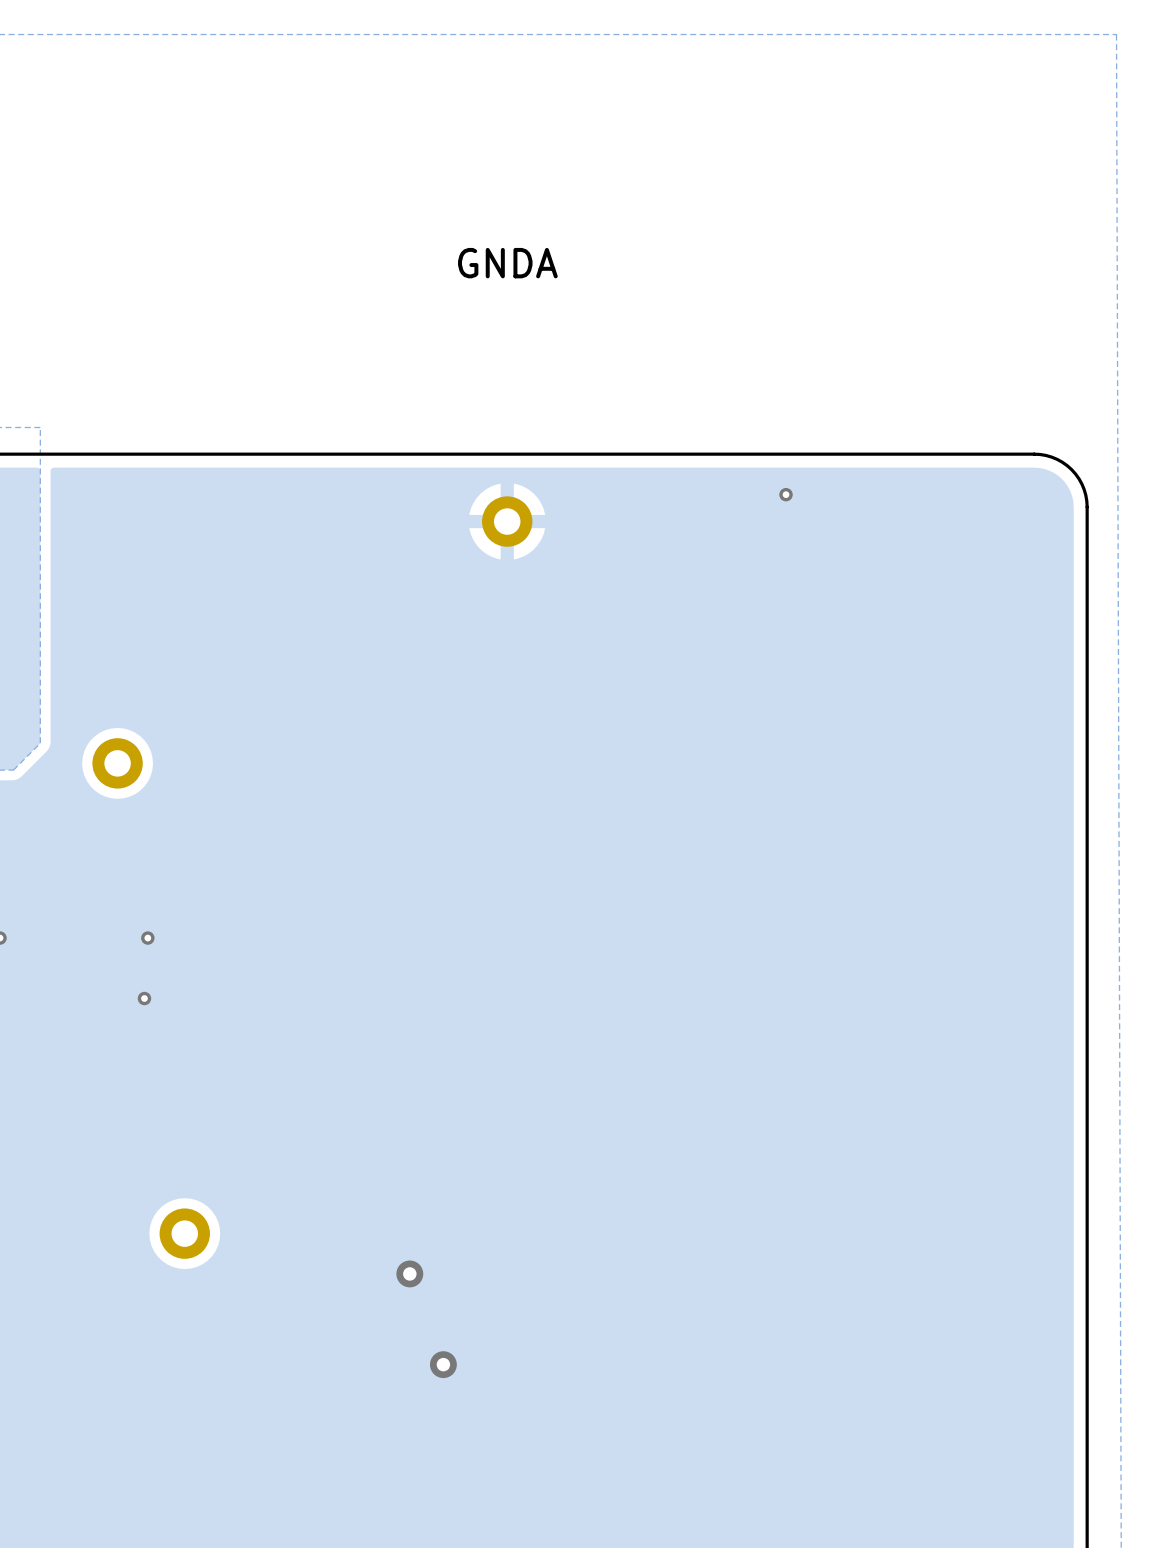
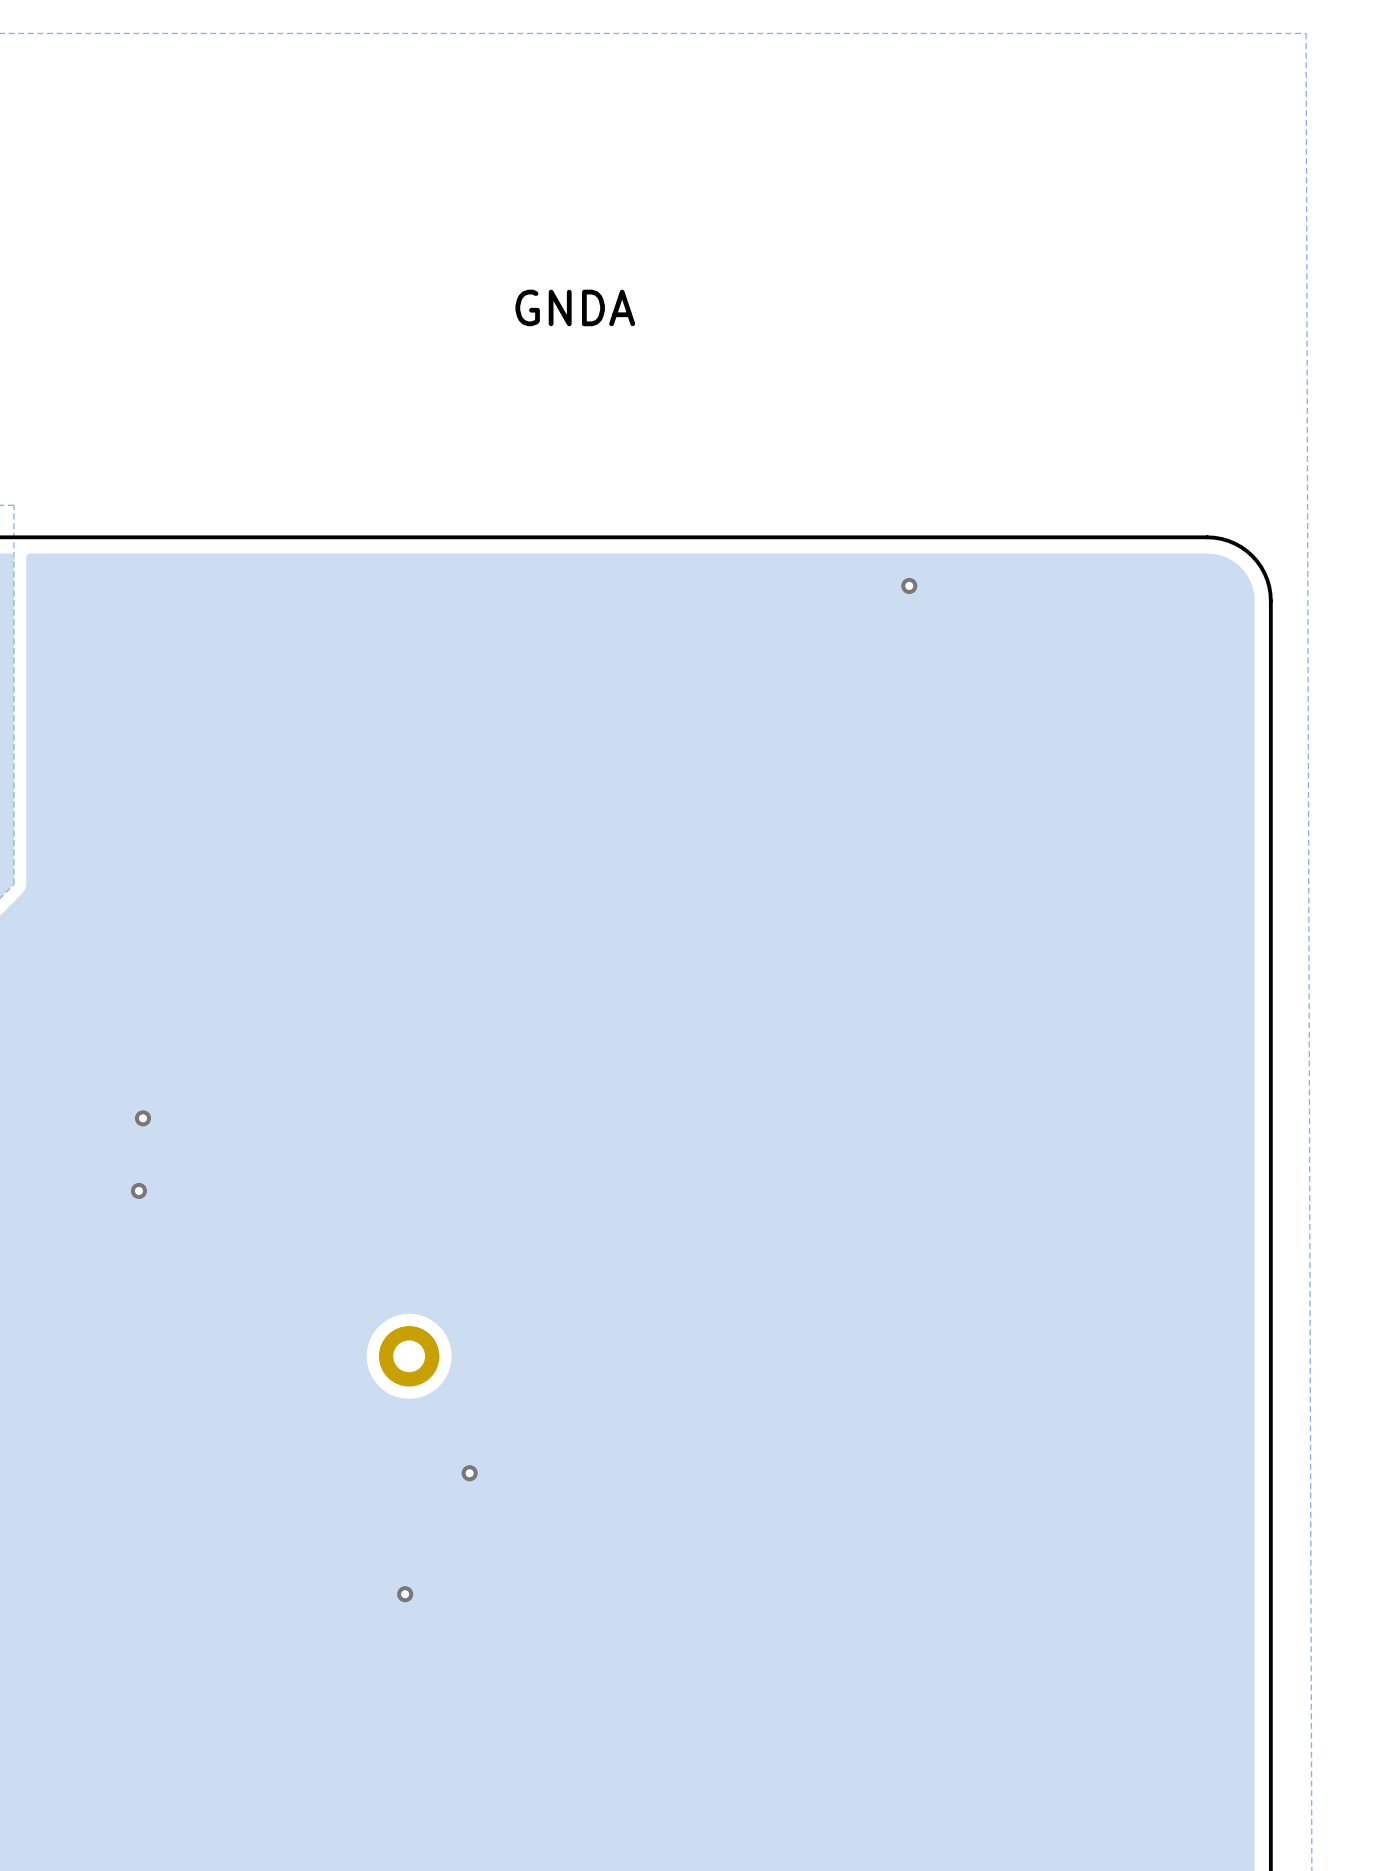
part: (507, 521) -> none
part: (117, 763) -> none
part position: (184, 1233) -> (409, 1356)
via: none -> (469, 1473)
via: (409, 1273) -> none
via: none -> (405, 1594)
via: (443, 1364) -> none

